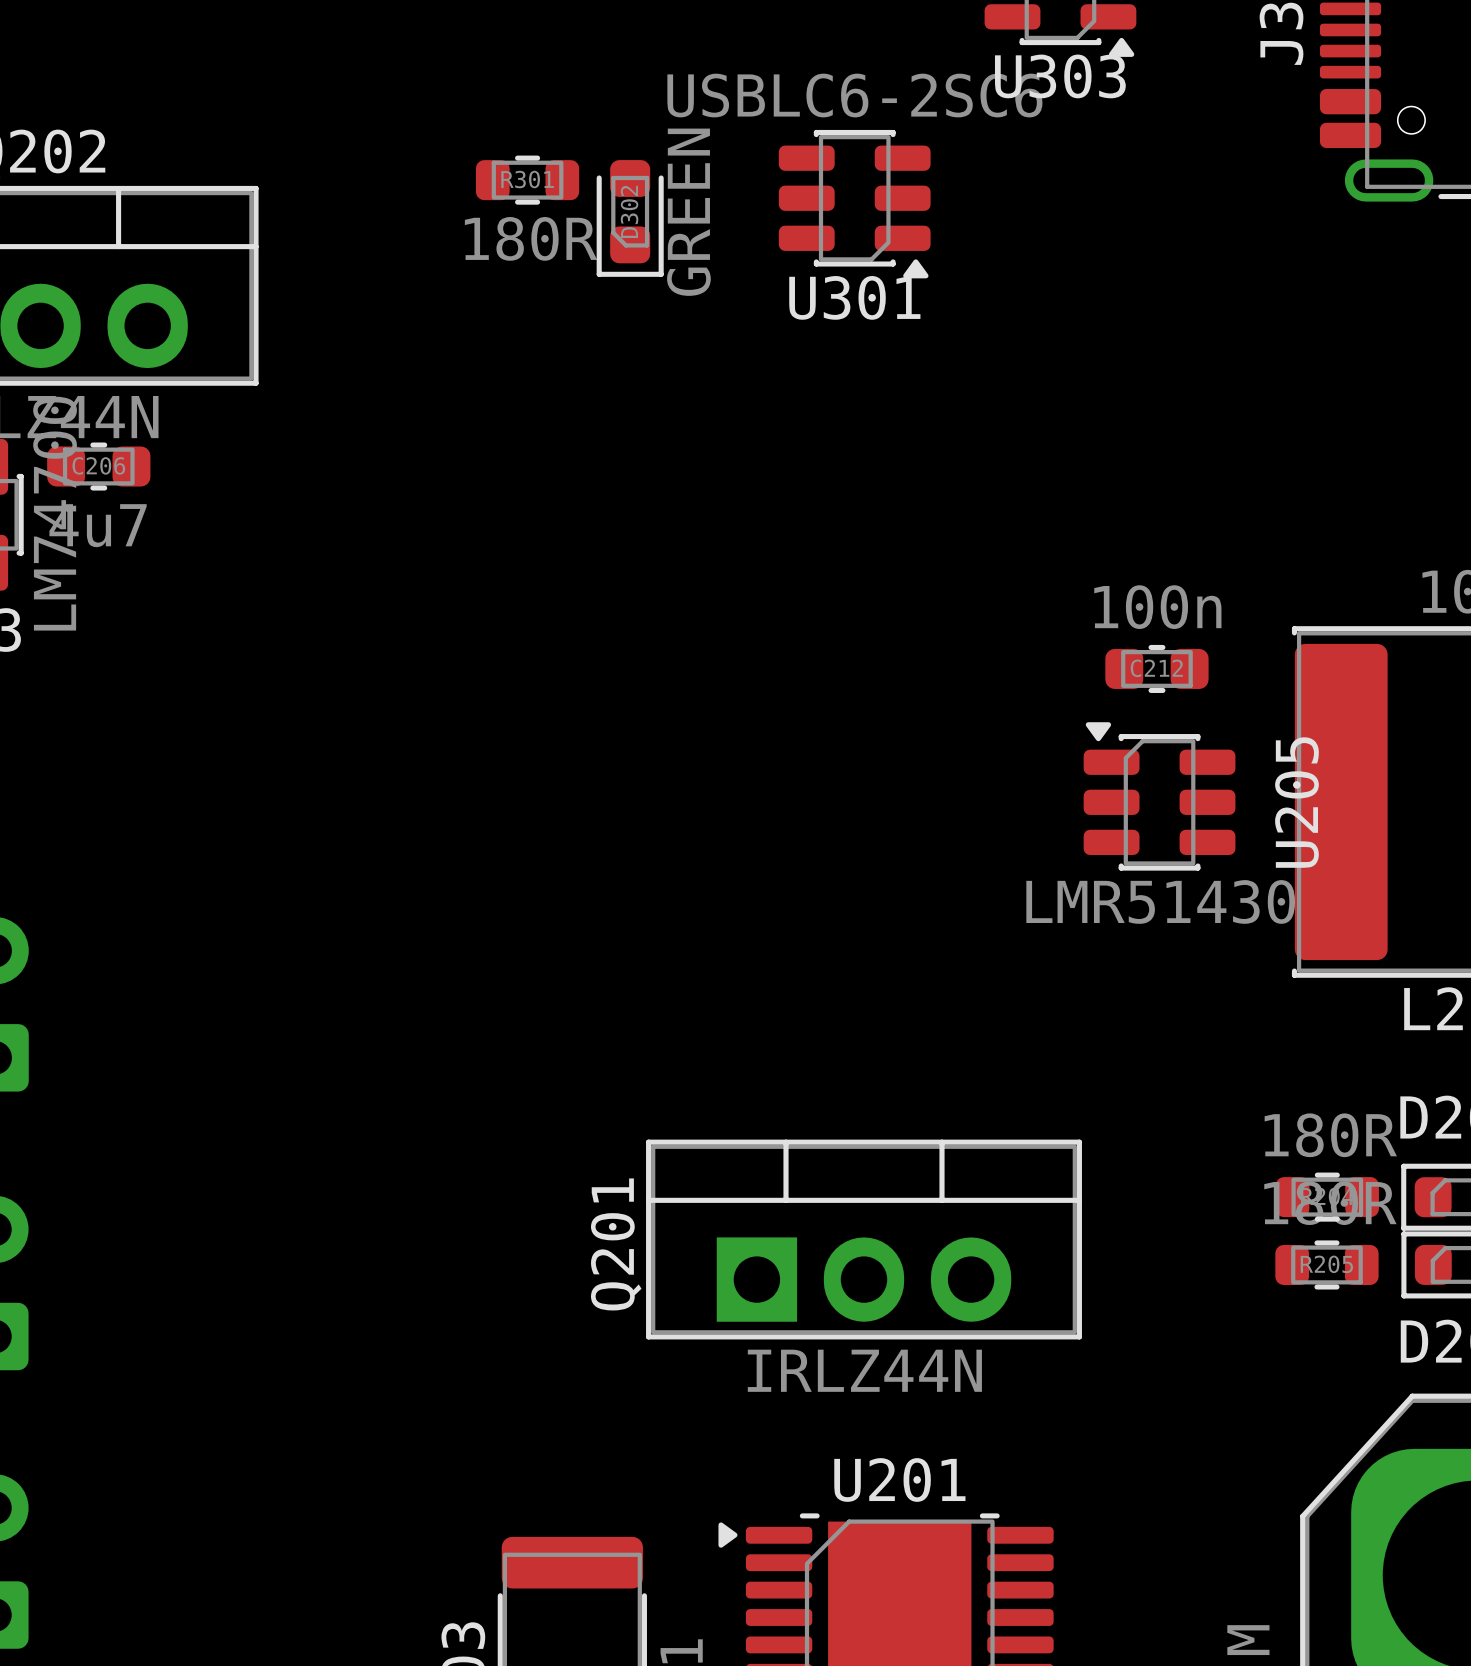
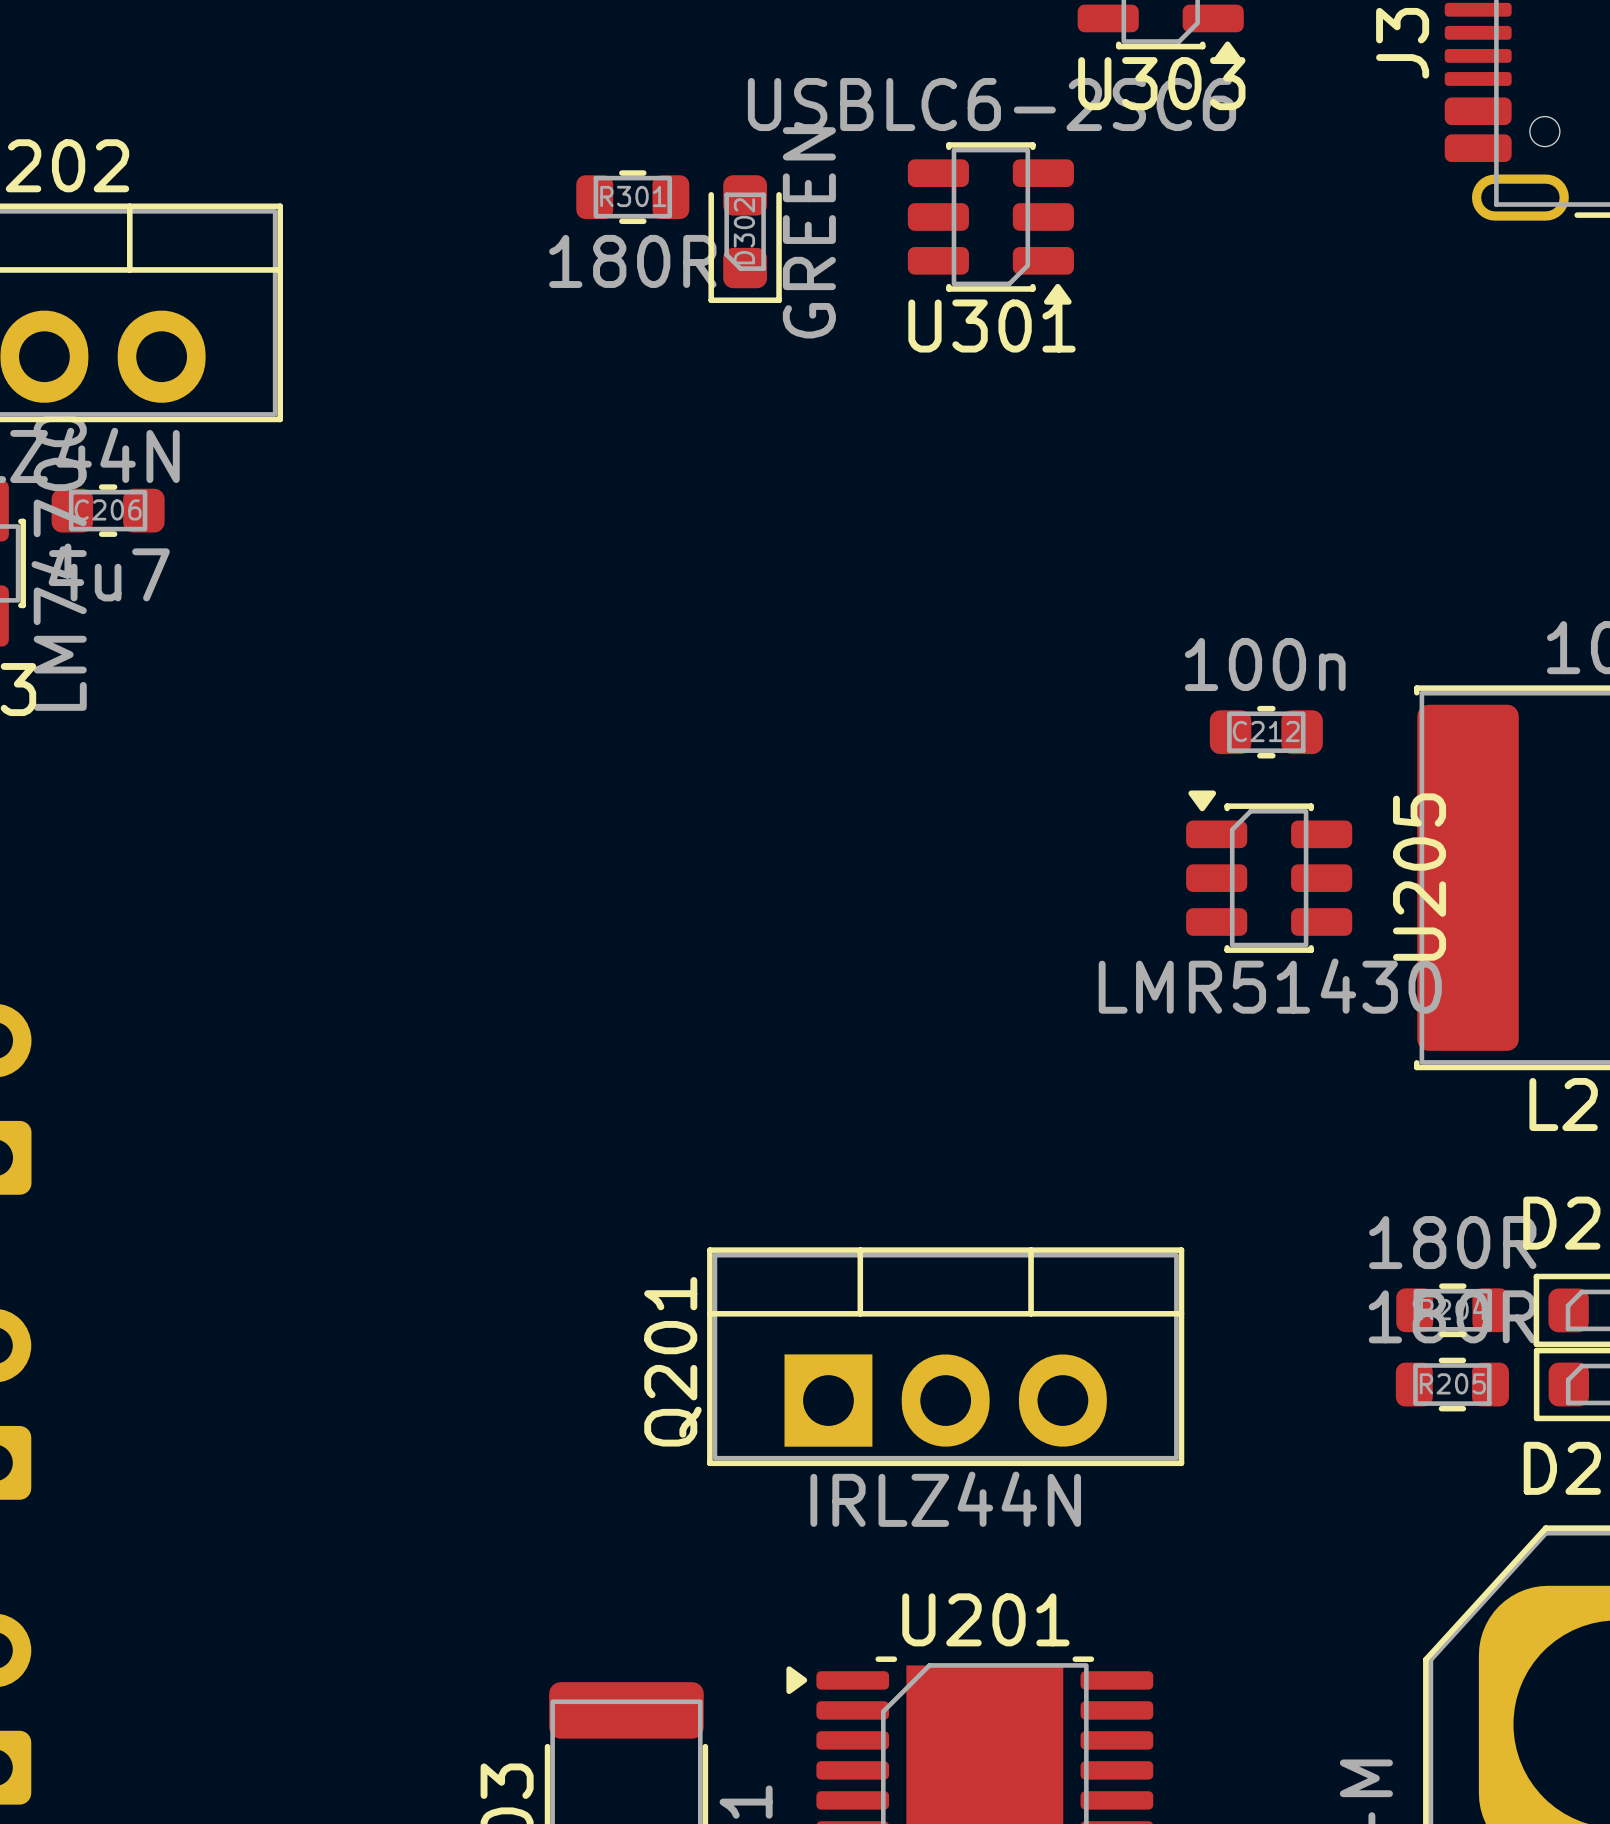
R301 position: (527, 180) -> (632, 197)
U301 position: (854, 204) -> (990, 223)
D302 position: (630, 218) -> (745, 239)

